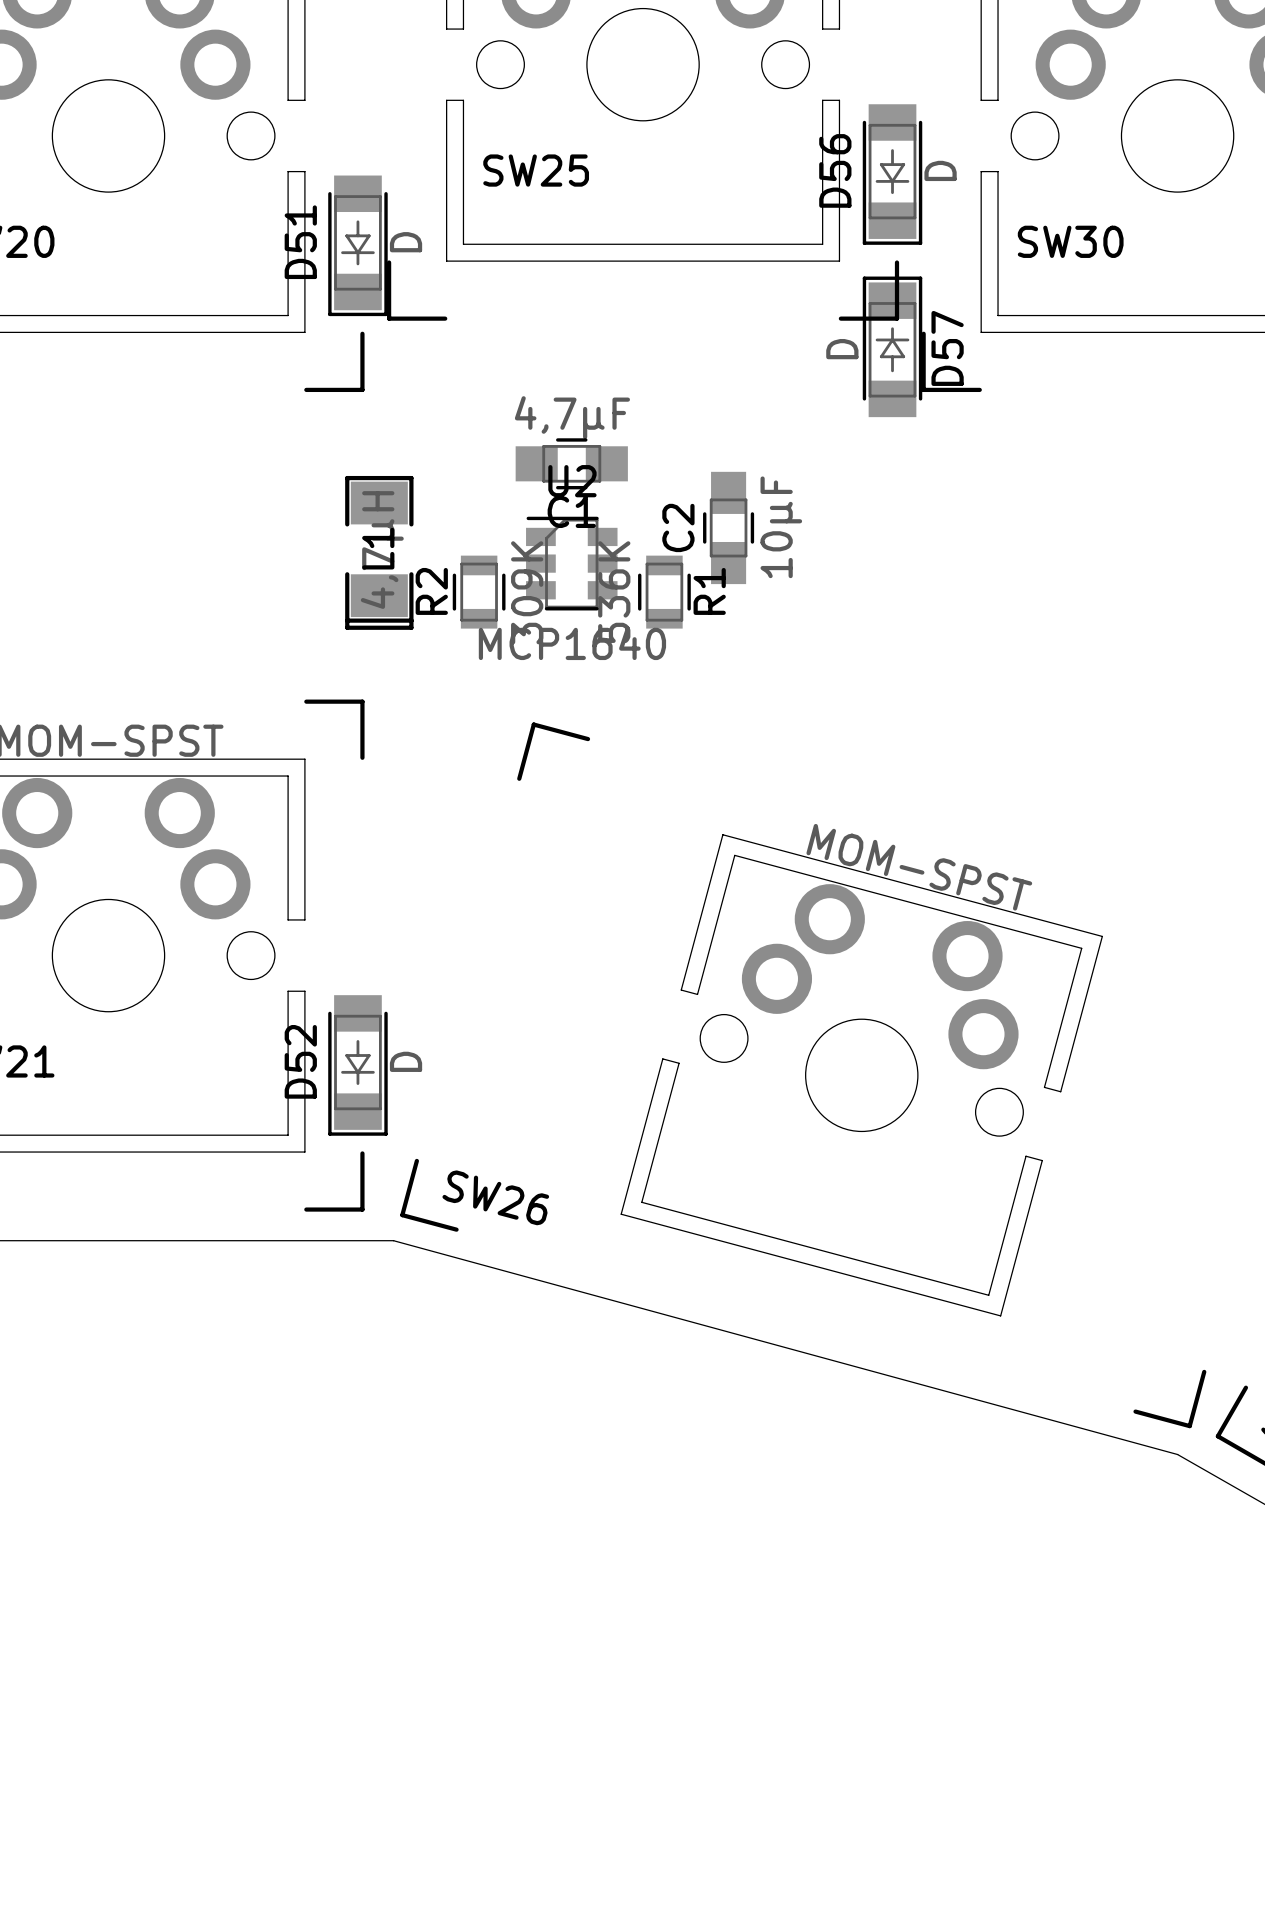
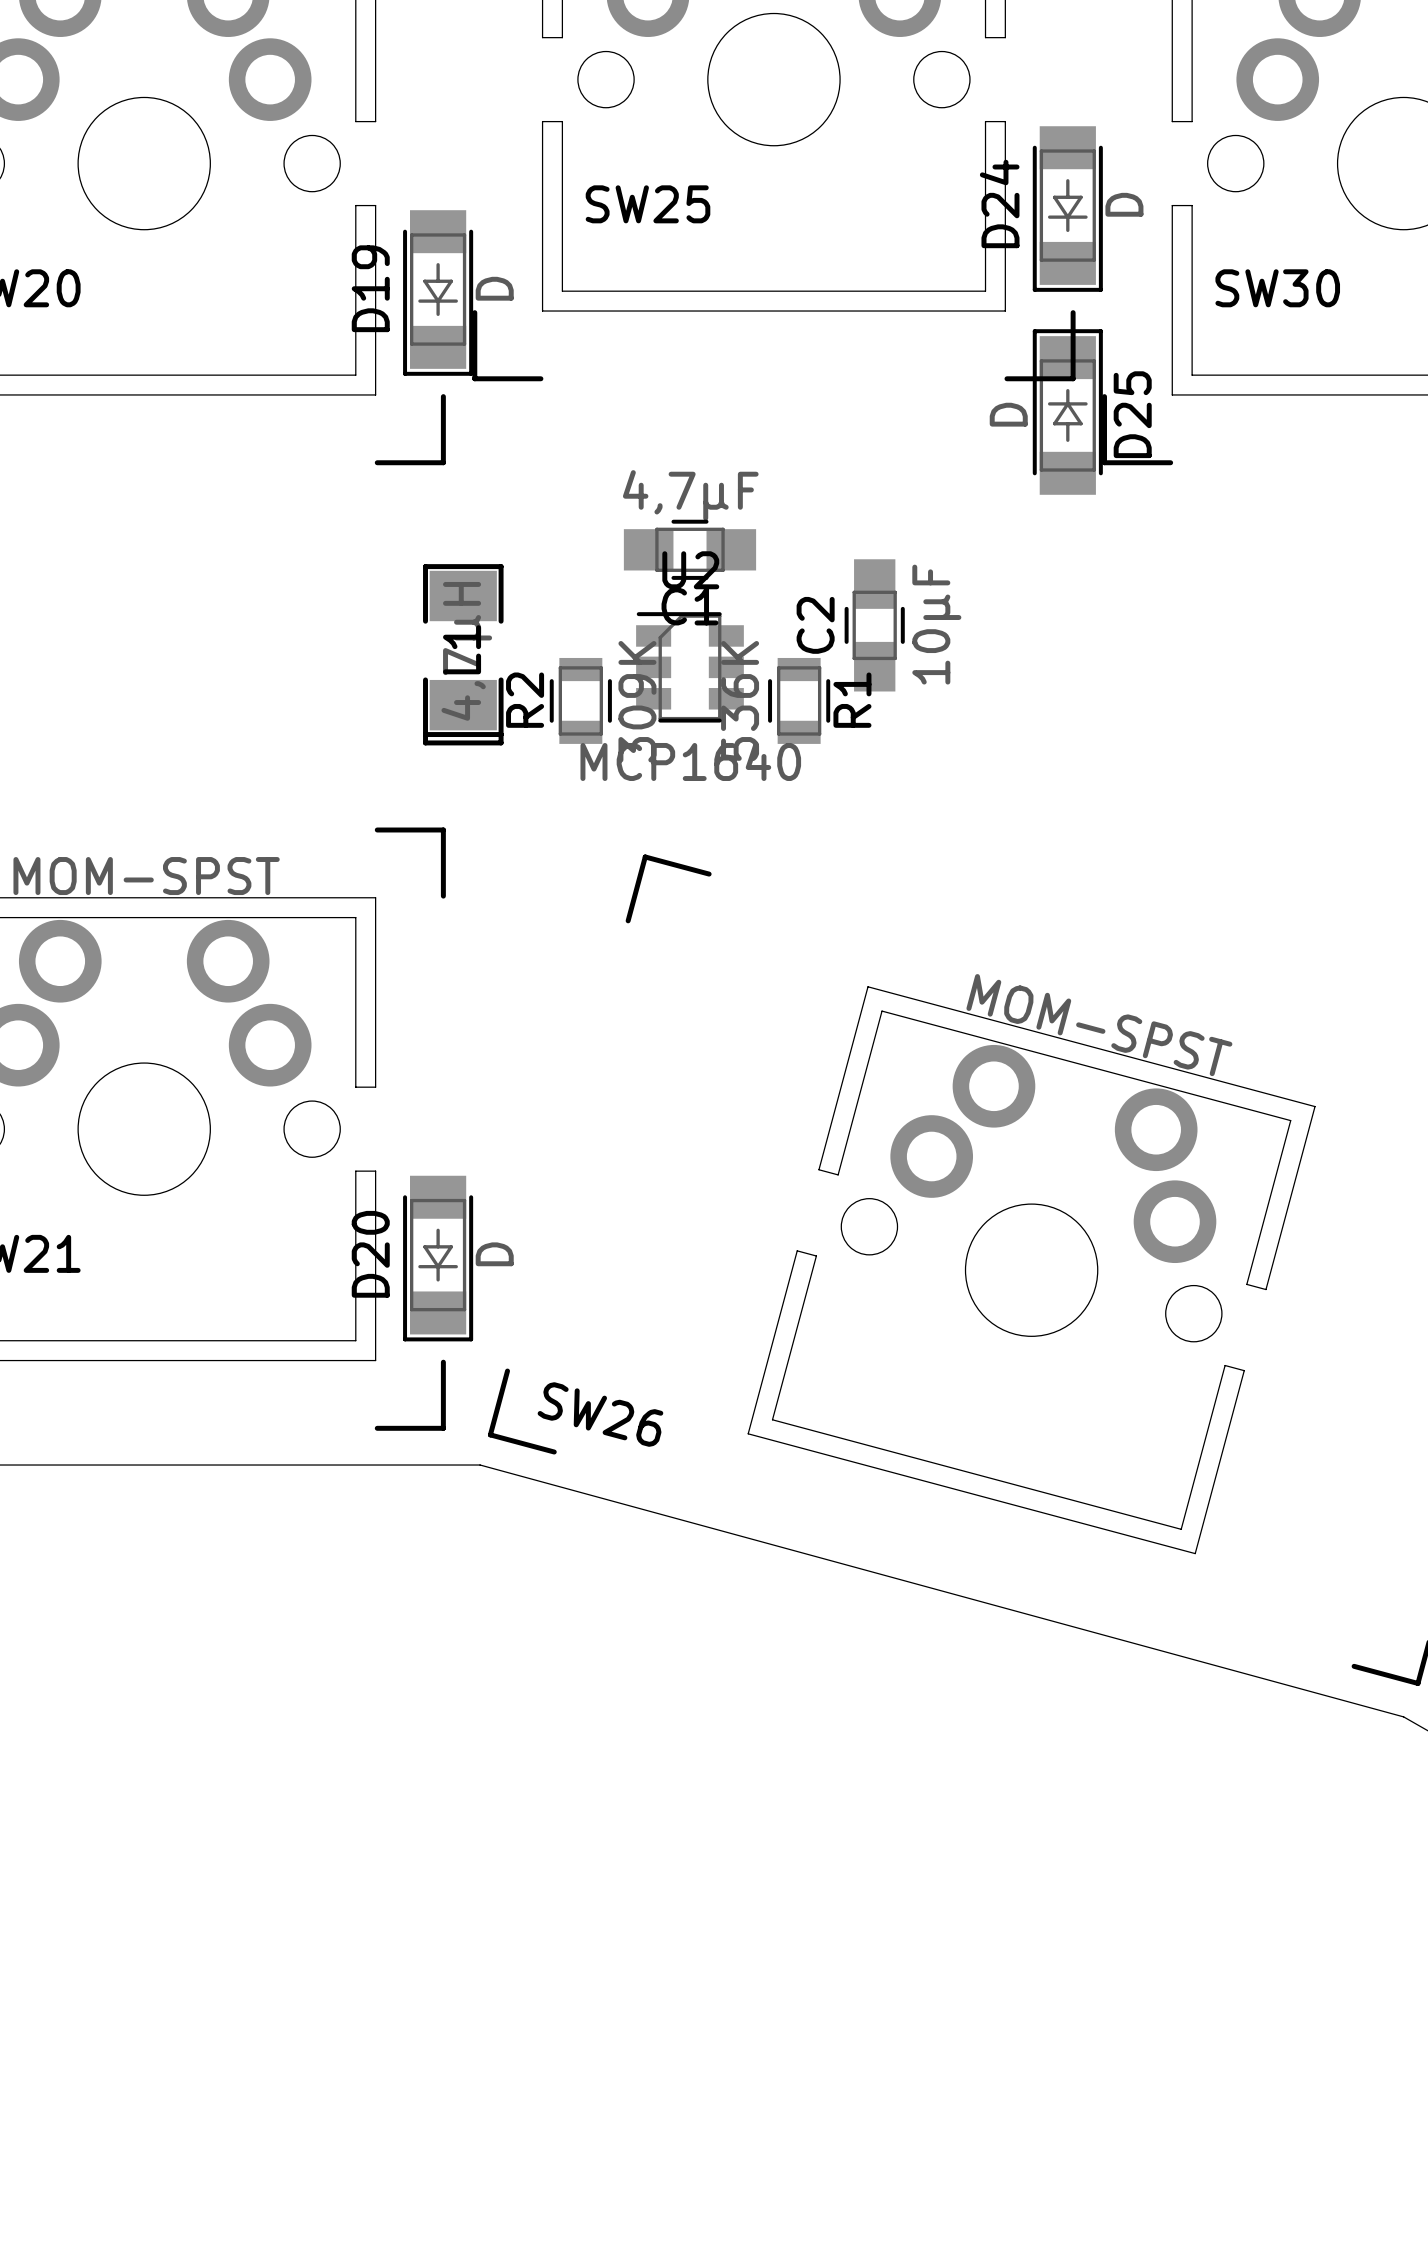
D56 name: D56 (835, 170) -> D24 (999, 203)
D51 name: D51 (300, 242) -> D19 (370, 288)
D57 name: D57 (947, 348) -> D25 (1132, 414)
D52 name: D52 (300, 1061) -> D20 (370, 1254)

